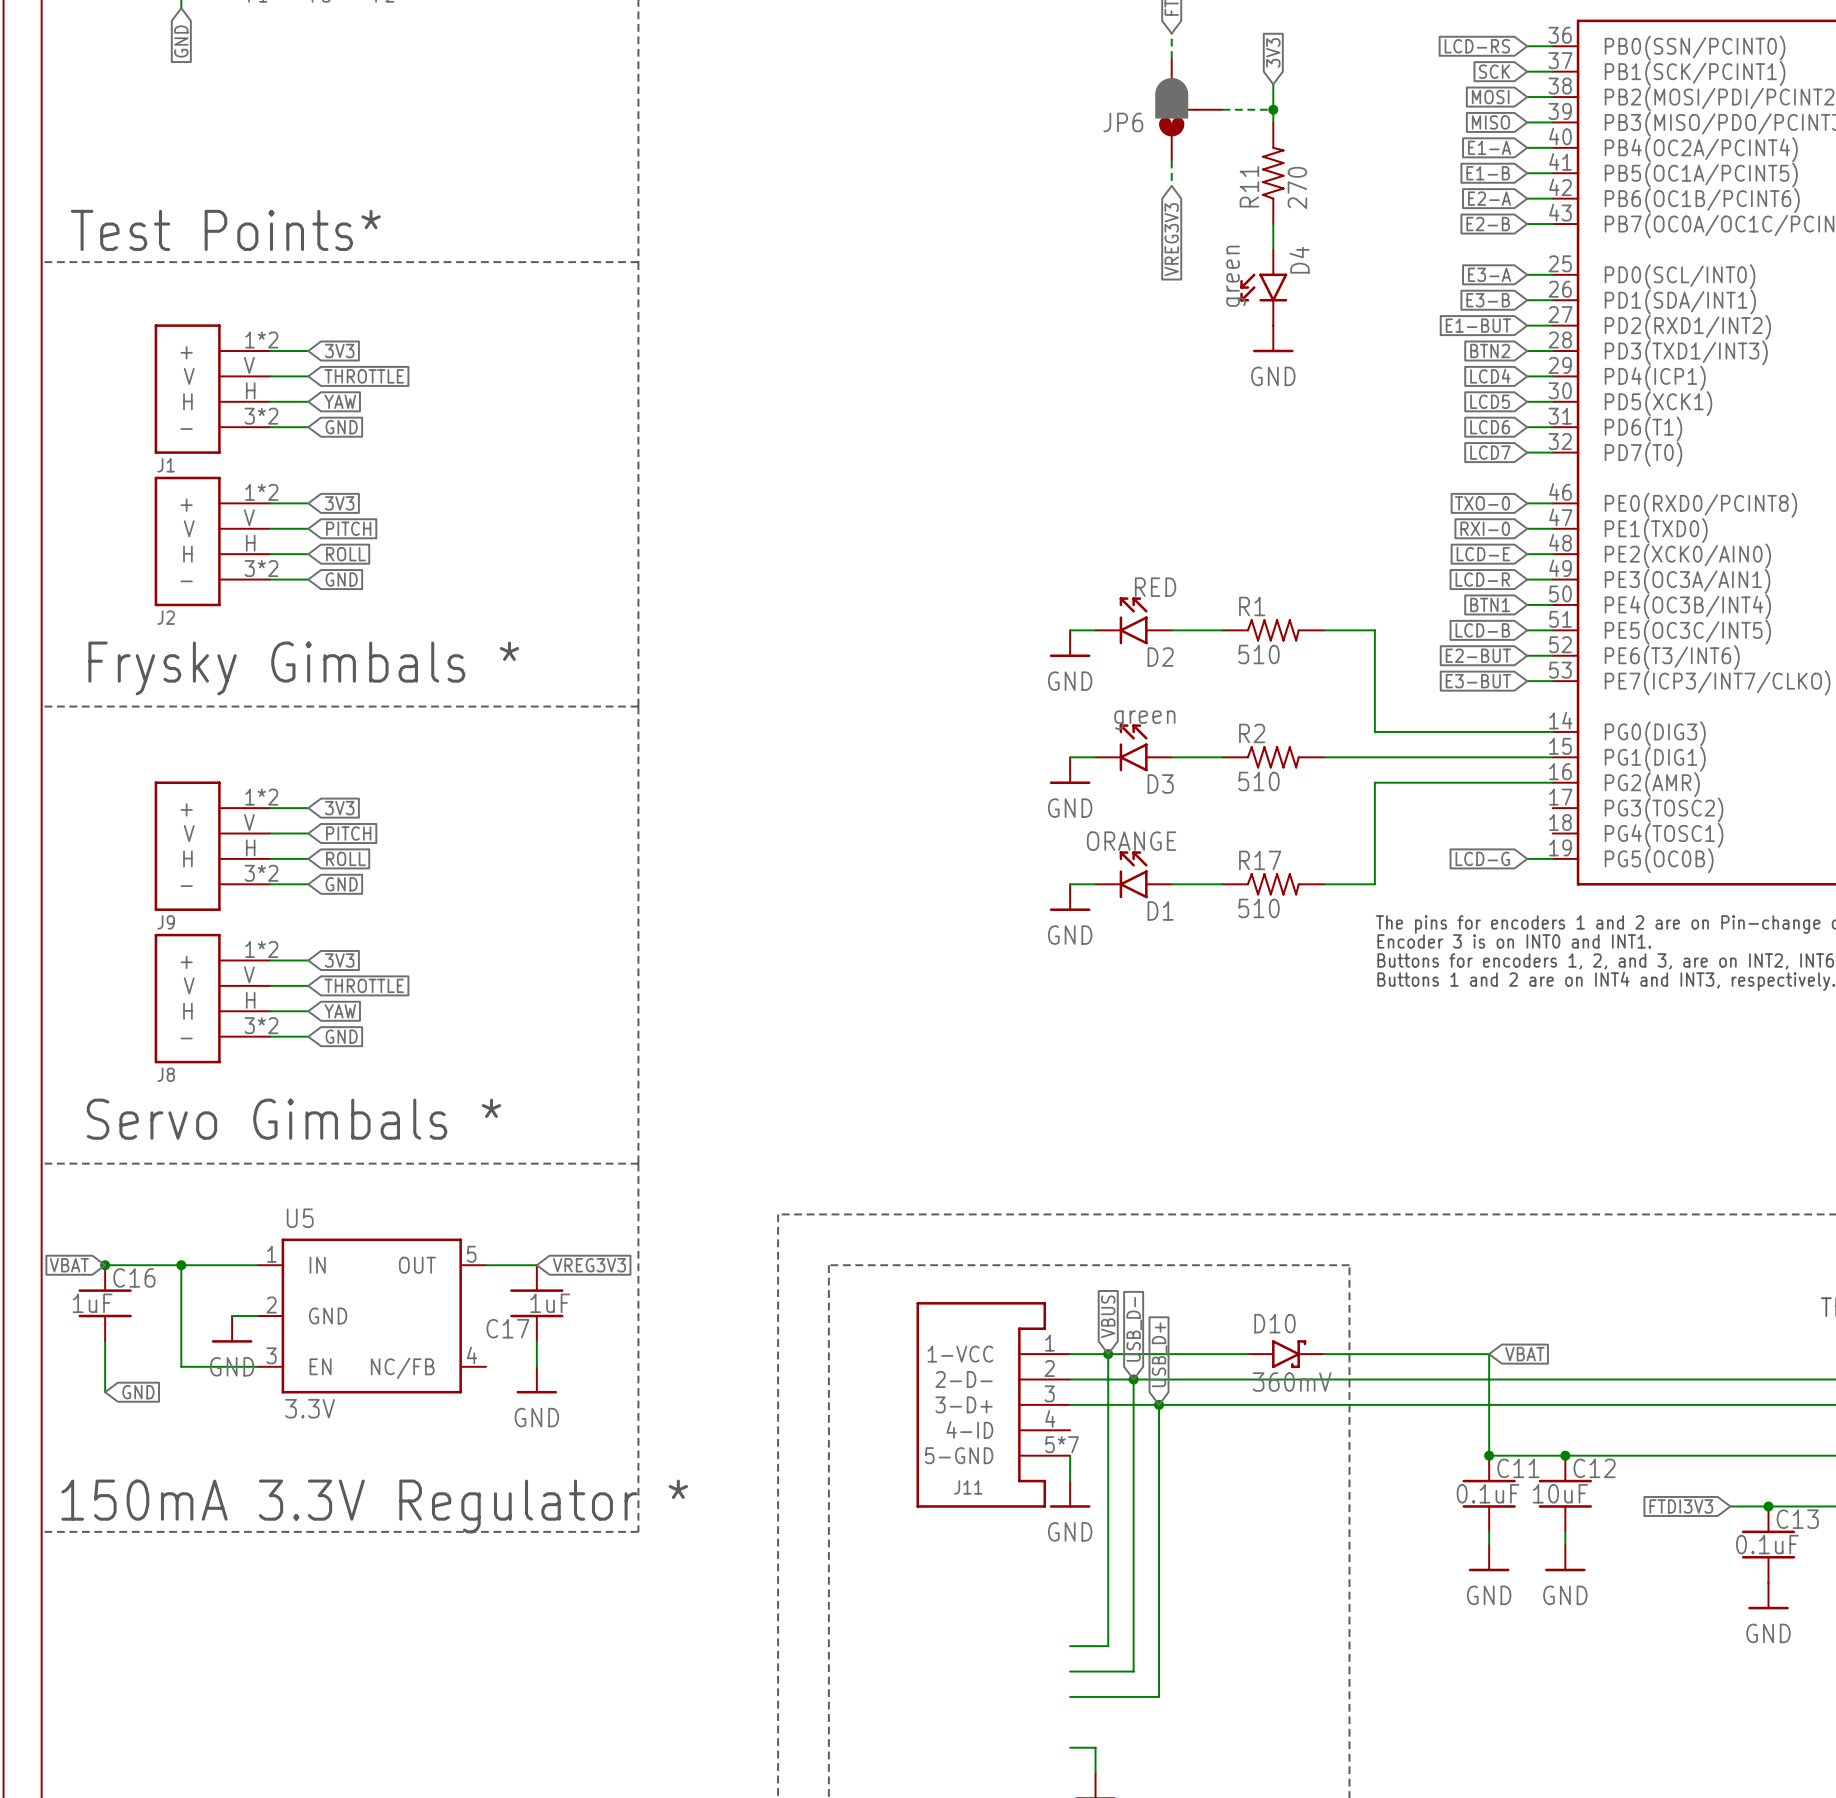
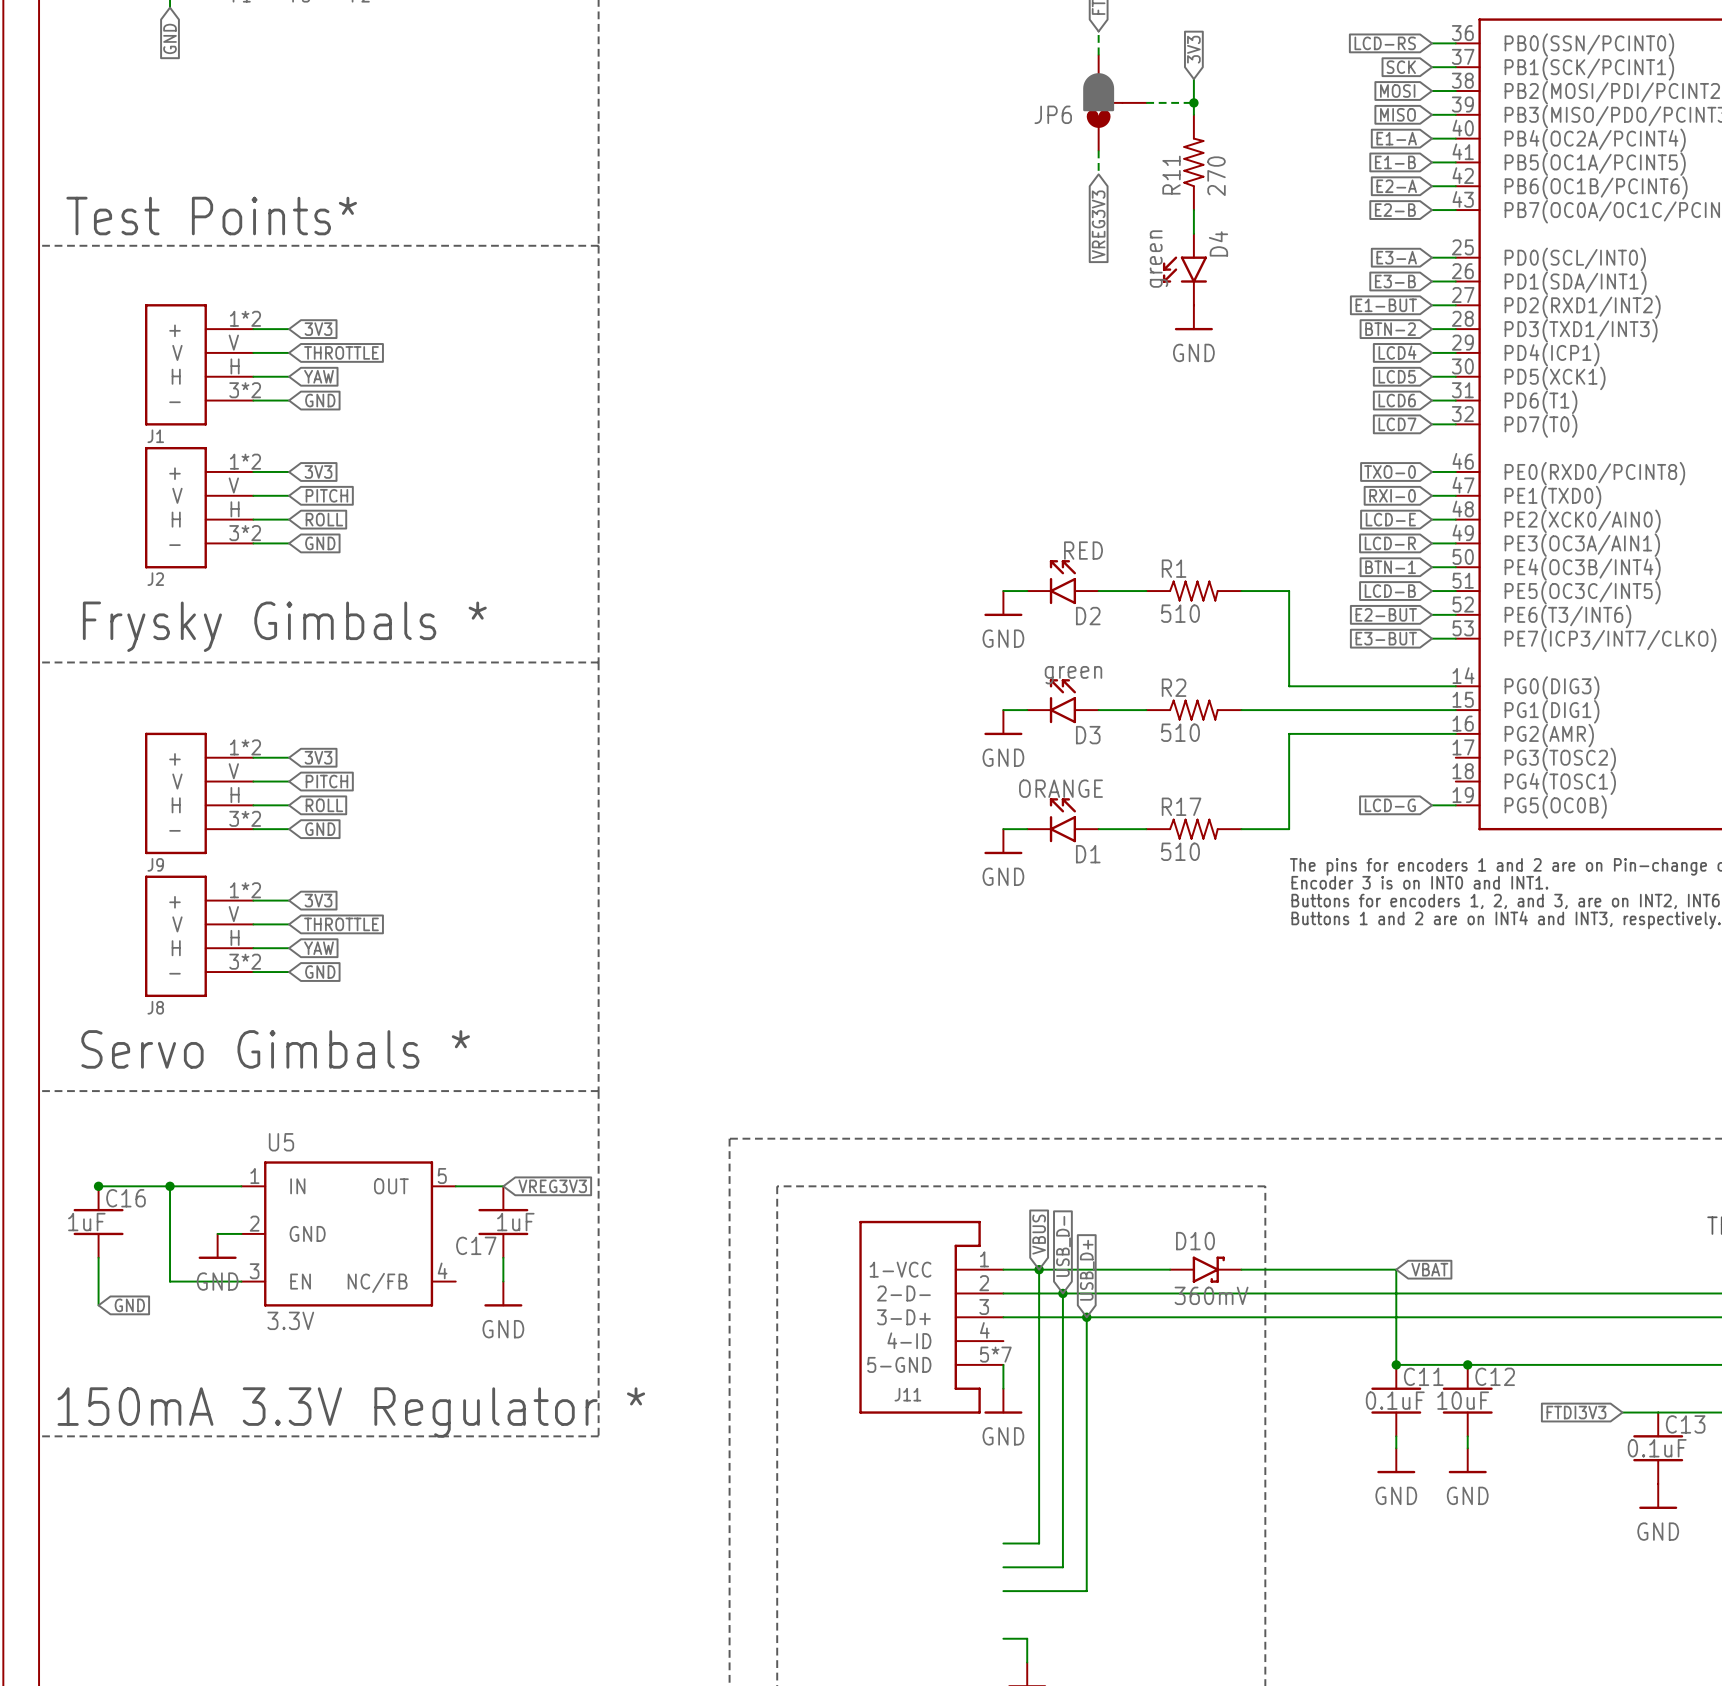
global label: BTN2 (1490, 351) -> BTN-2 (1390, 329)
global label: BTN1 (1490, 604) -> BTN-1 (1390, 567)
global label: VBAT (69, 1265) -> none
junction: (1768, 1506) -> none

